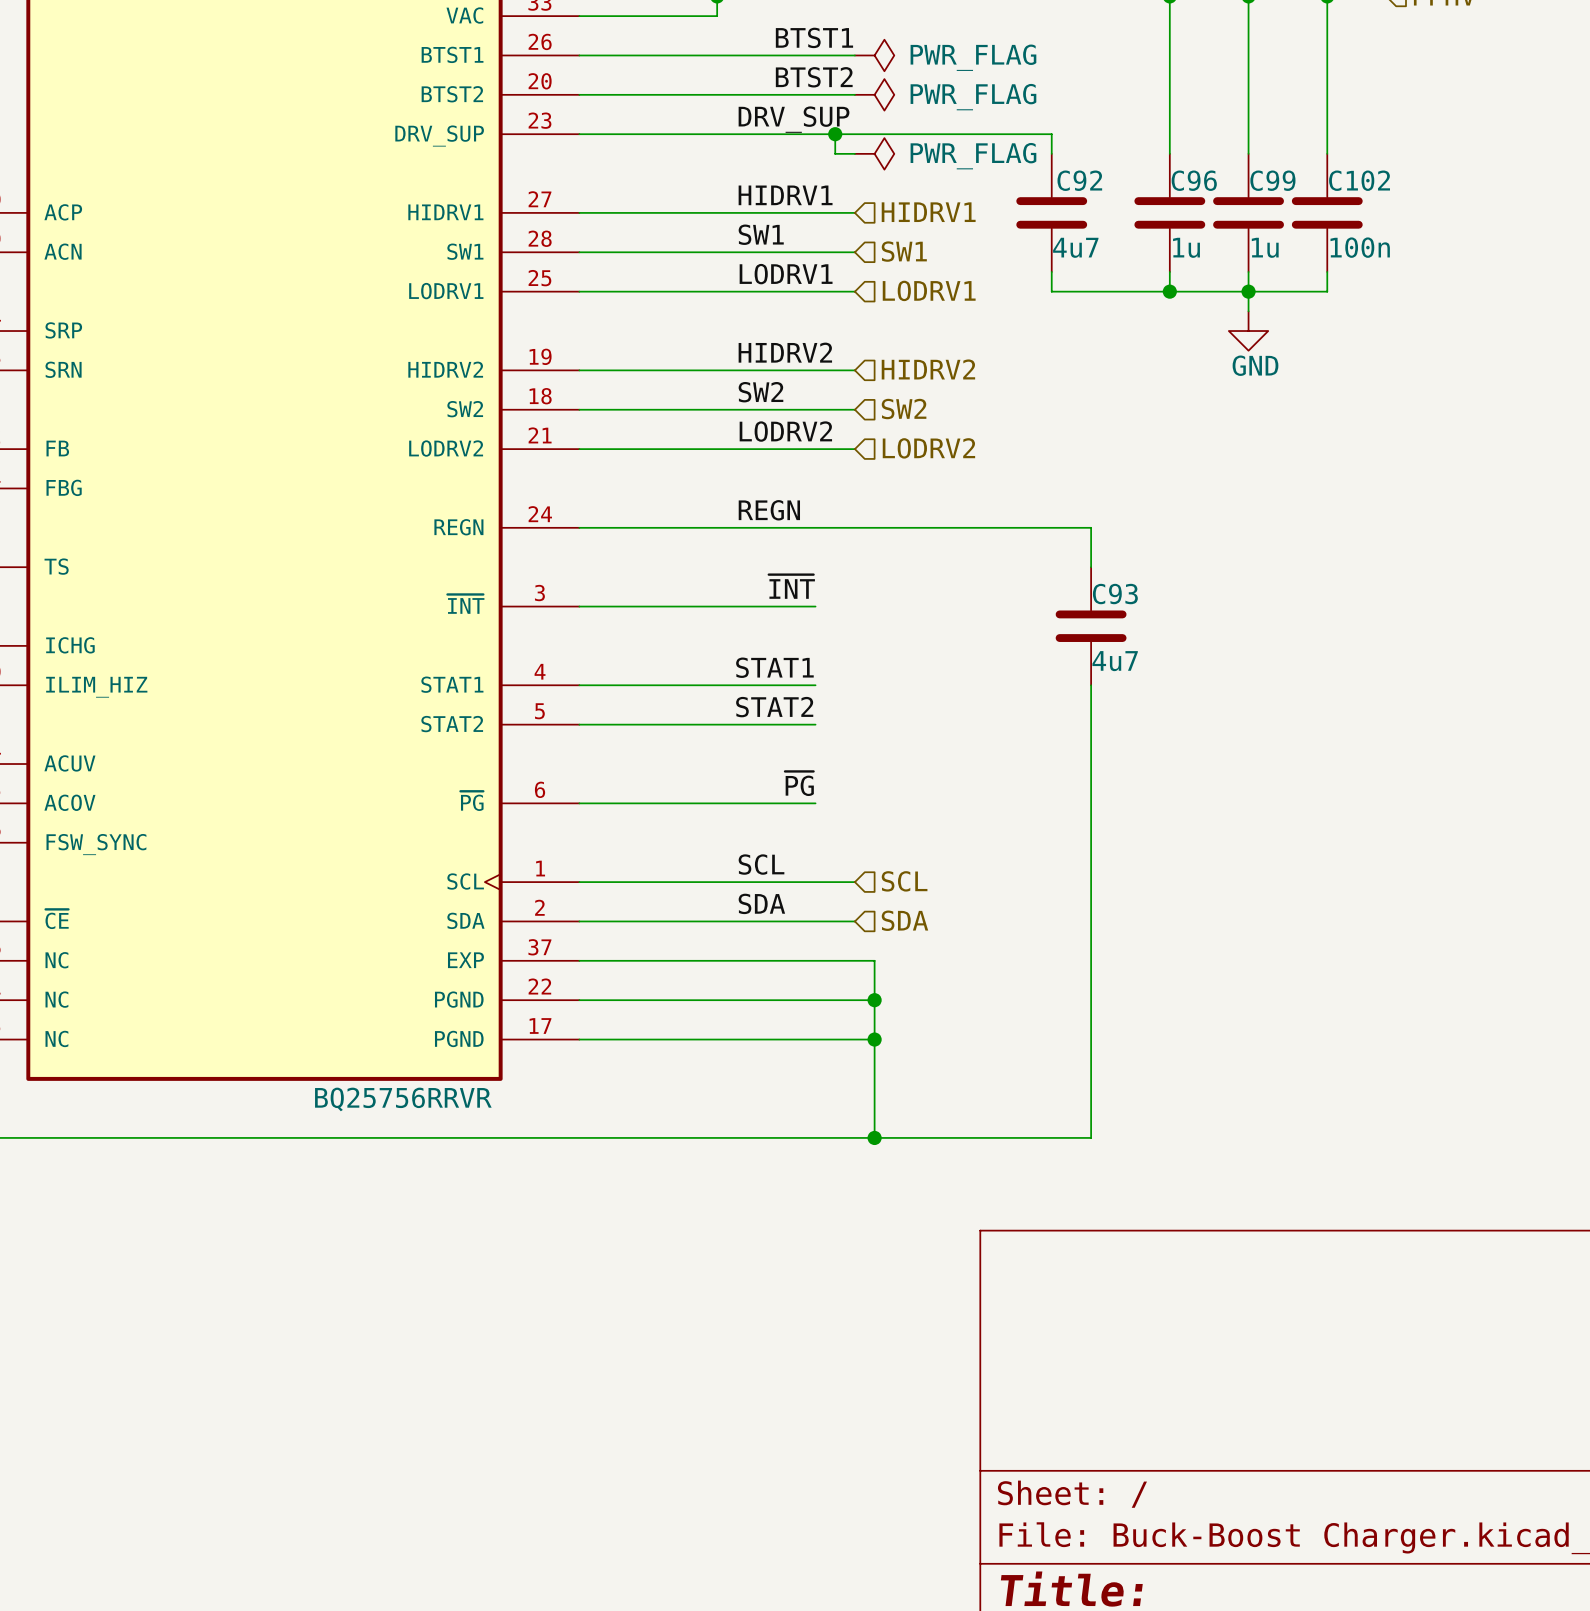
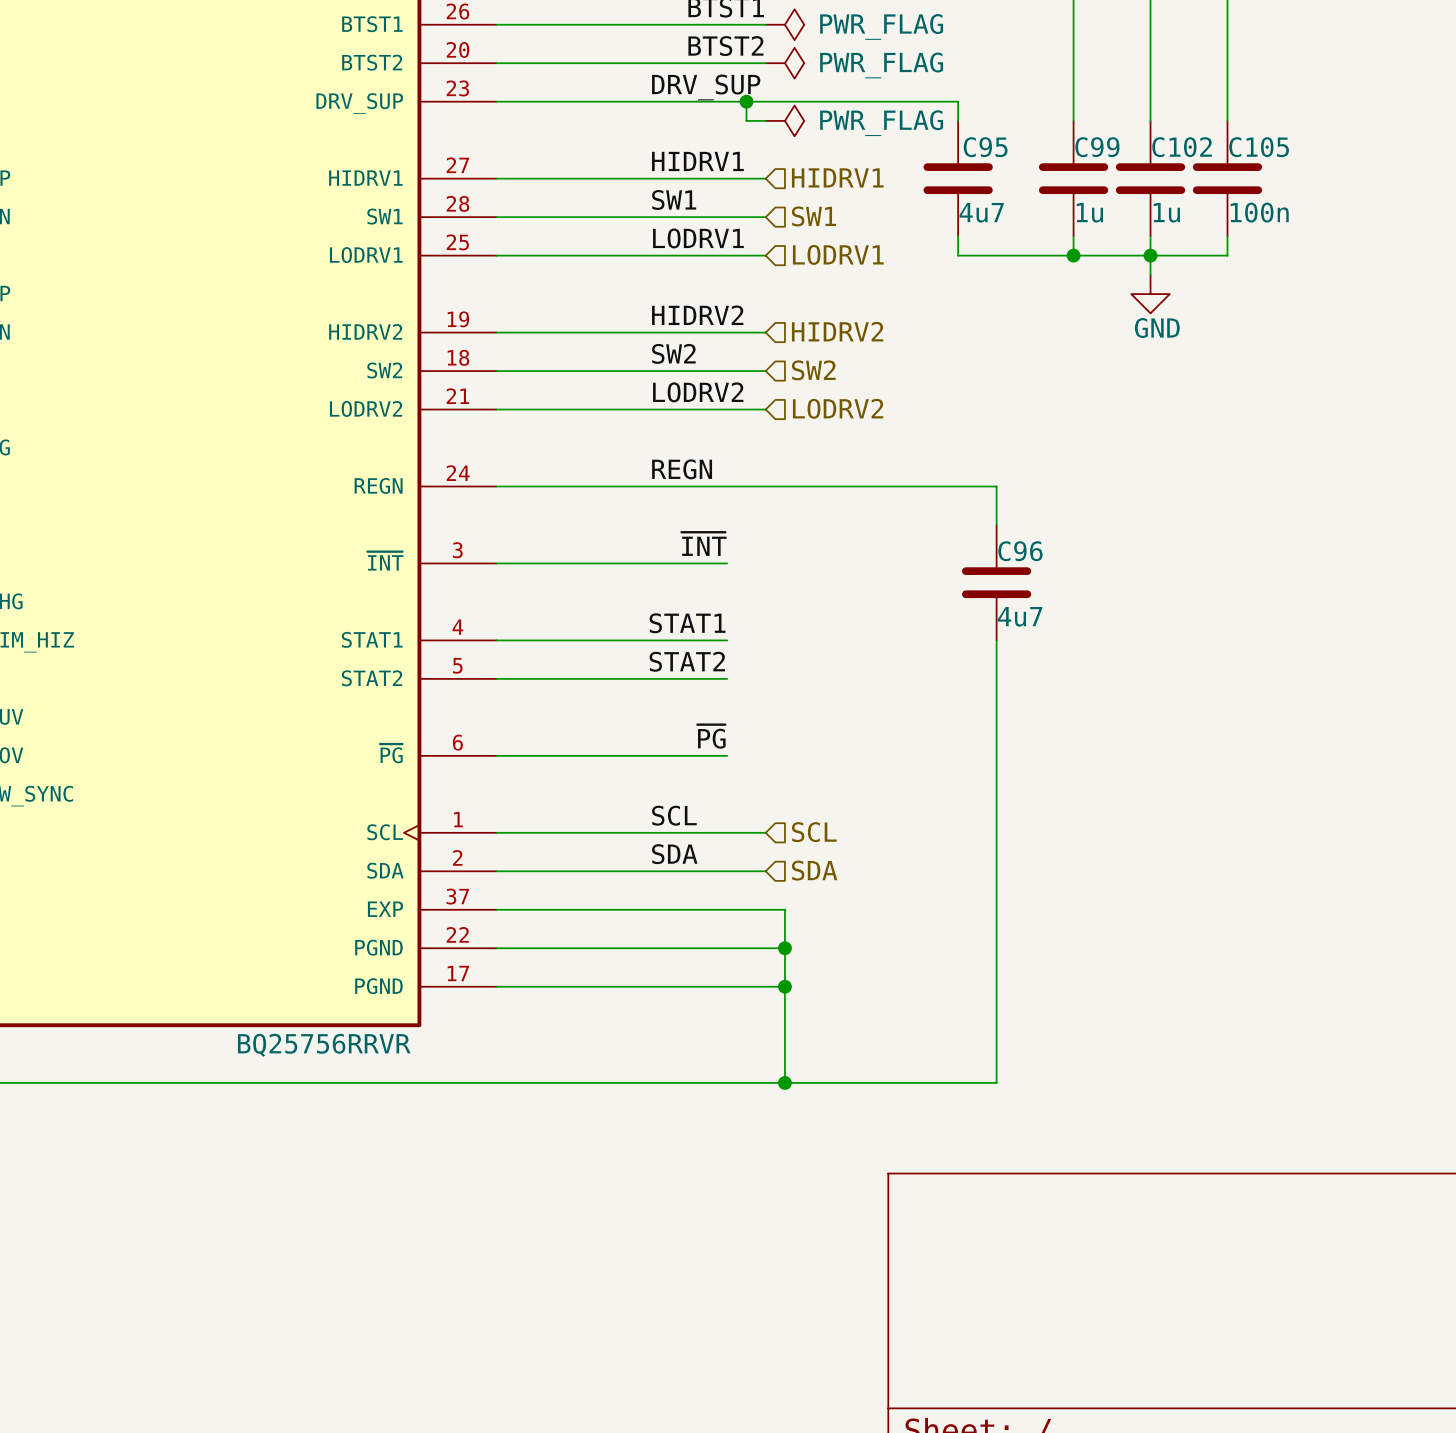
C92 name: C92 (1079, 180) -> C95 (985, 147)
C96 name: C96 (1194, 180) -> C99 (1097, 147)
C99 name: C99 (1272, 180) -> C102 (1182, 147)
C102 name: C102 (1359, 180) -> C105 (1259, 147)
C93 name: C93 (1115, 594) -> C96 (1020, 551)

